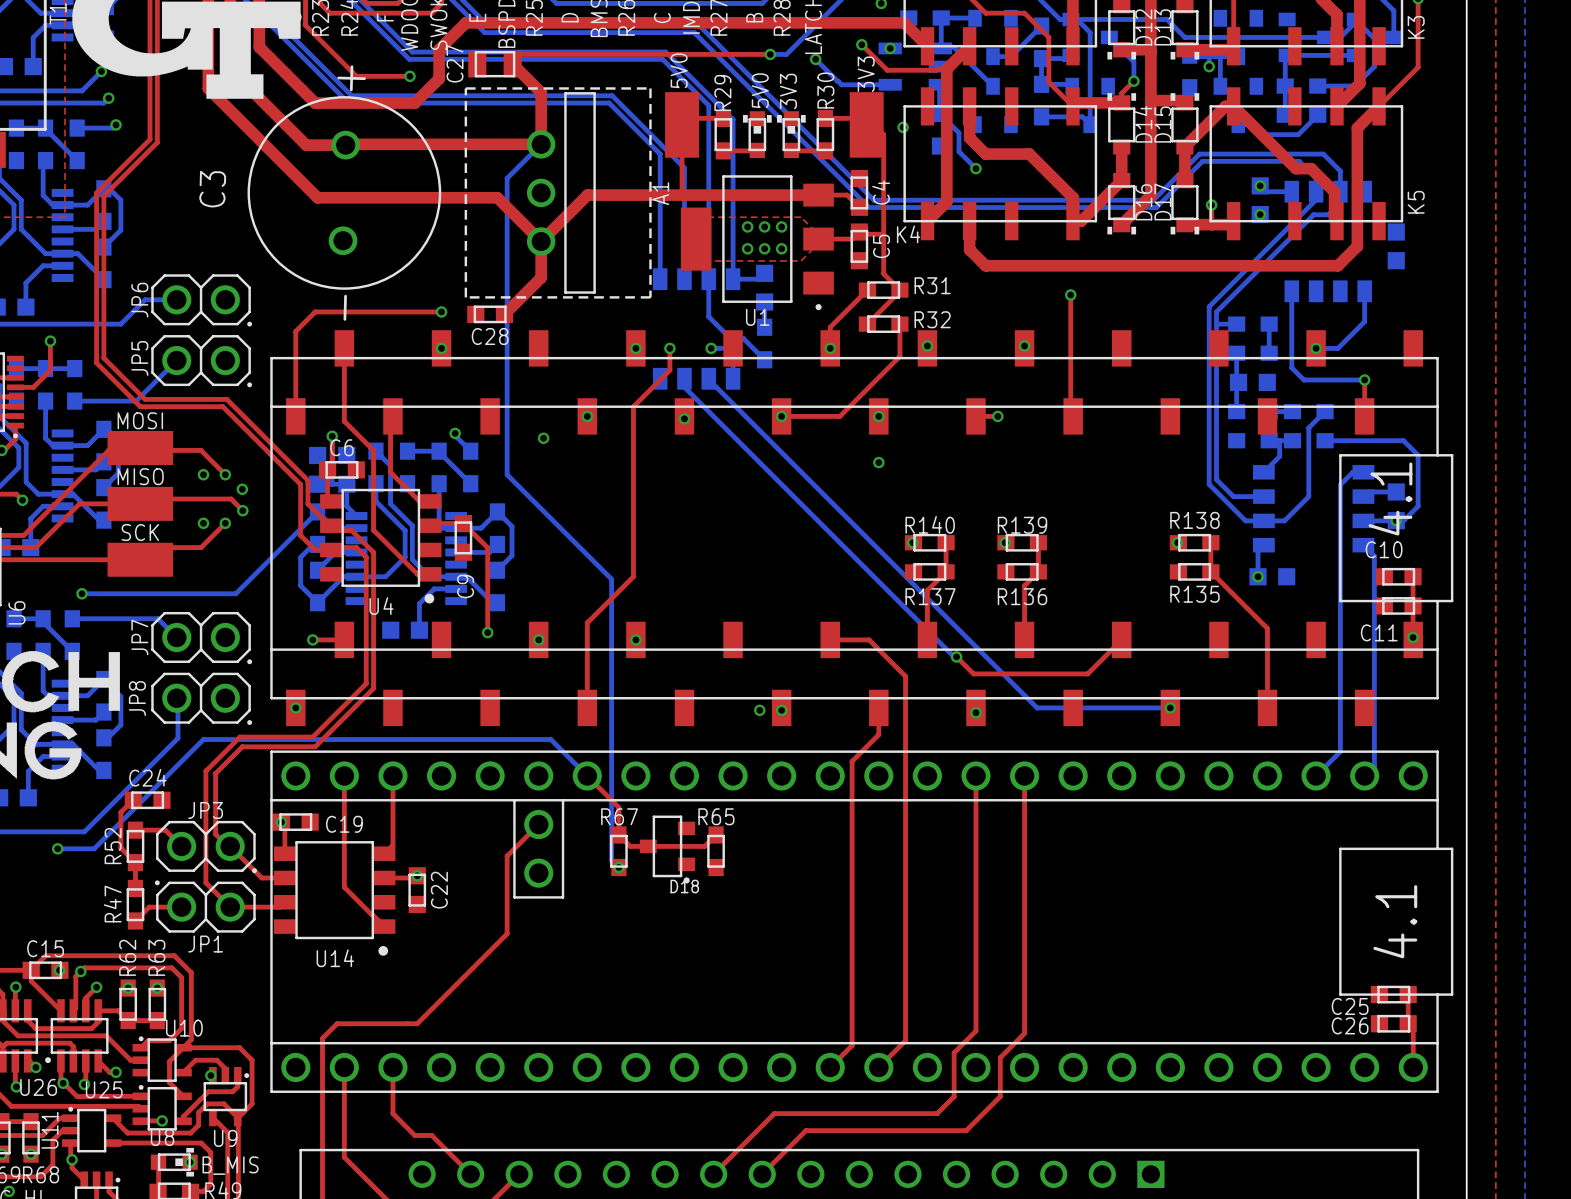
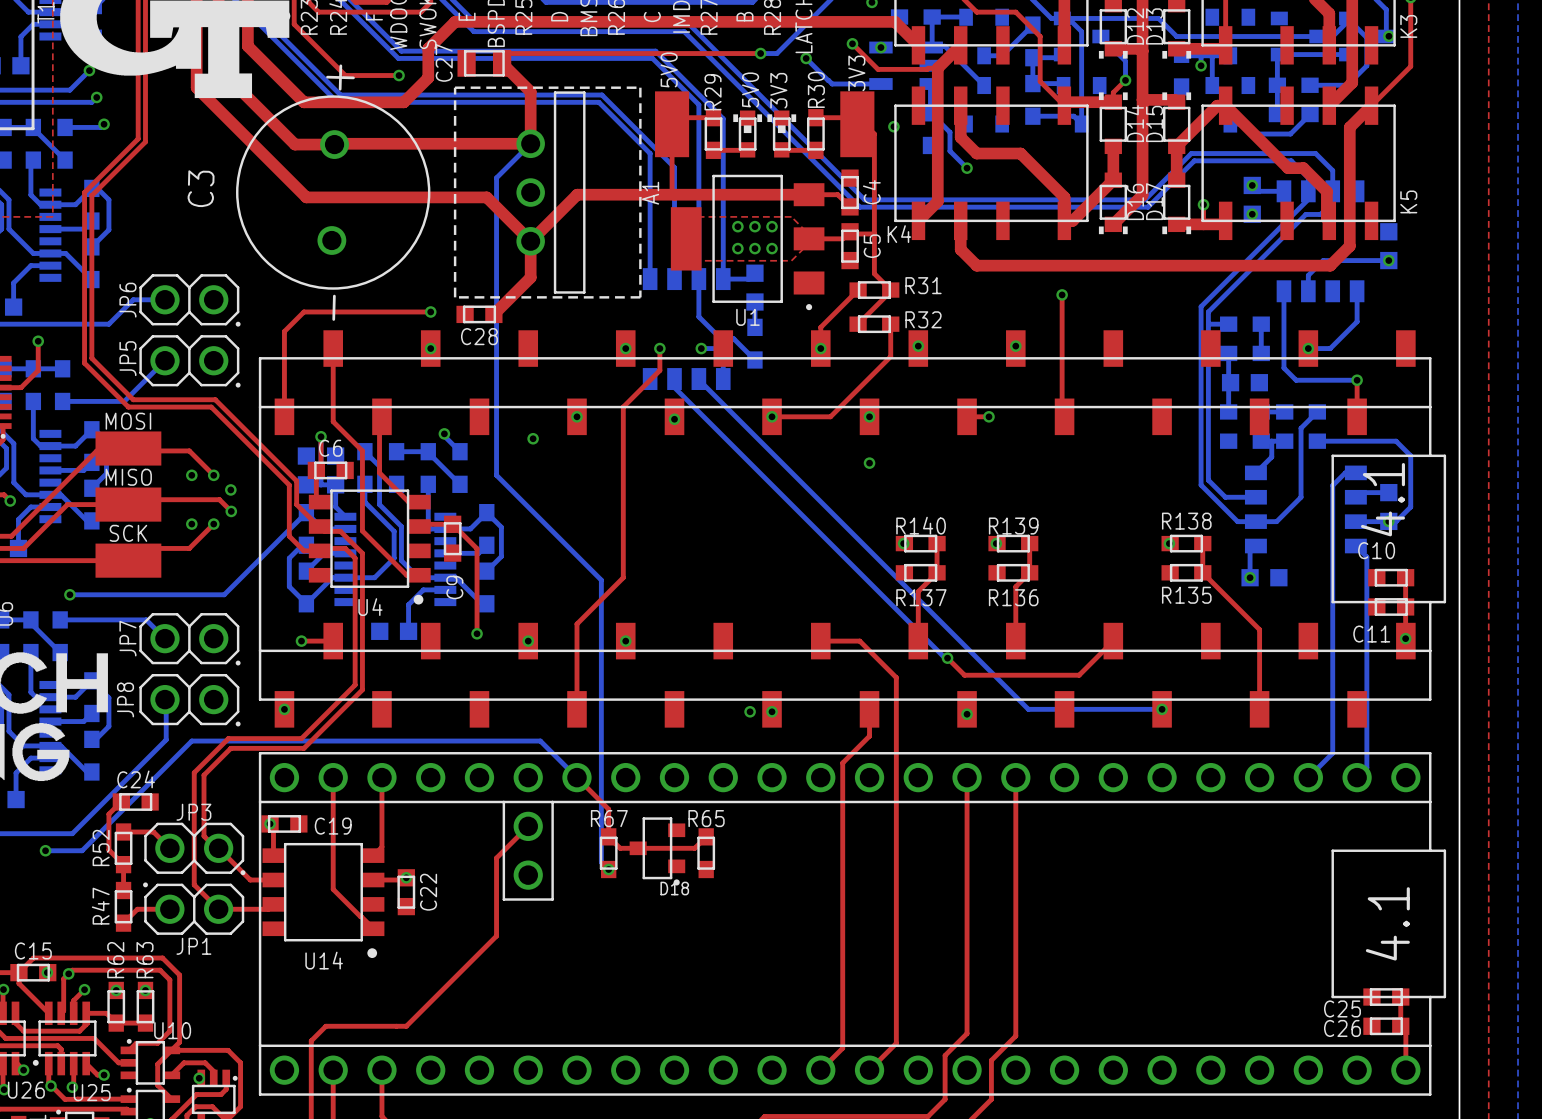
via: none -> (1388, 36)
bottom track: none -> (1388, 260) (1323, 260) (1308, 275) (1308, 291)
via: none -> (1388, 260)

